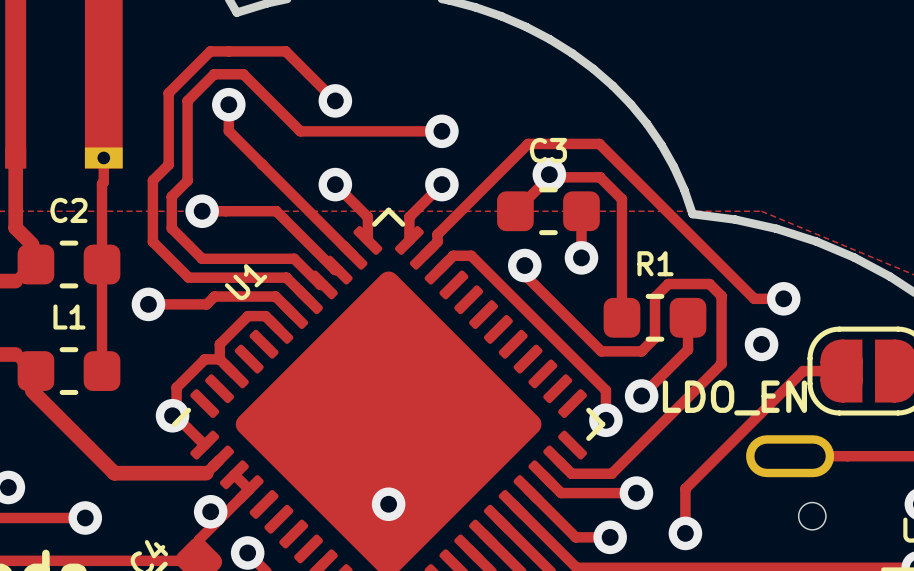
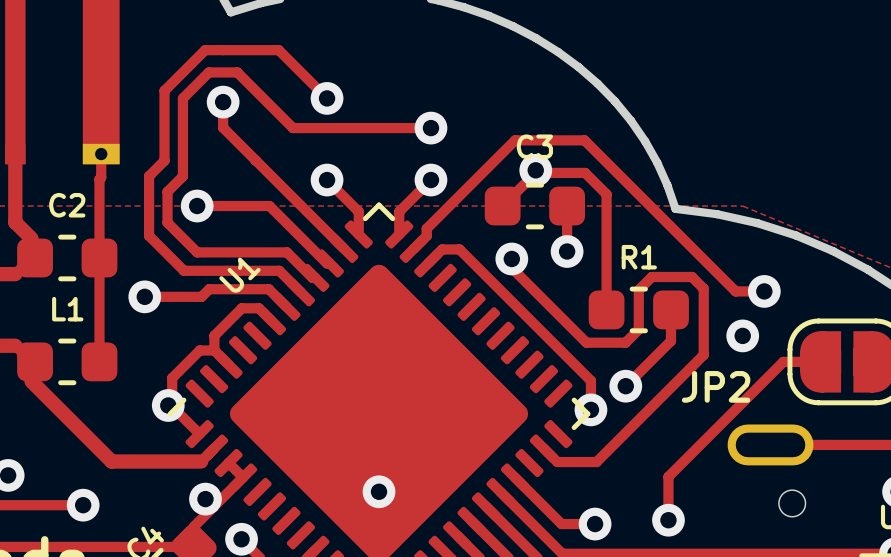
LDO_EN name: LDO_EN (734, 397) -> JP2 (716, 386)
track: (542, 474) (561, 493) (636, 493) -> none
via: (636, 493) -> none

